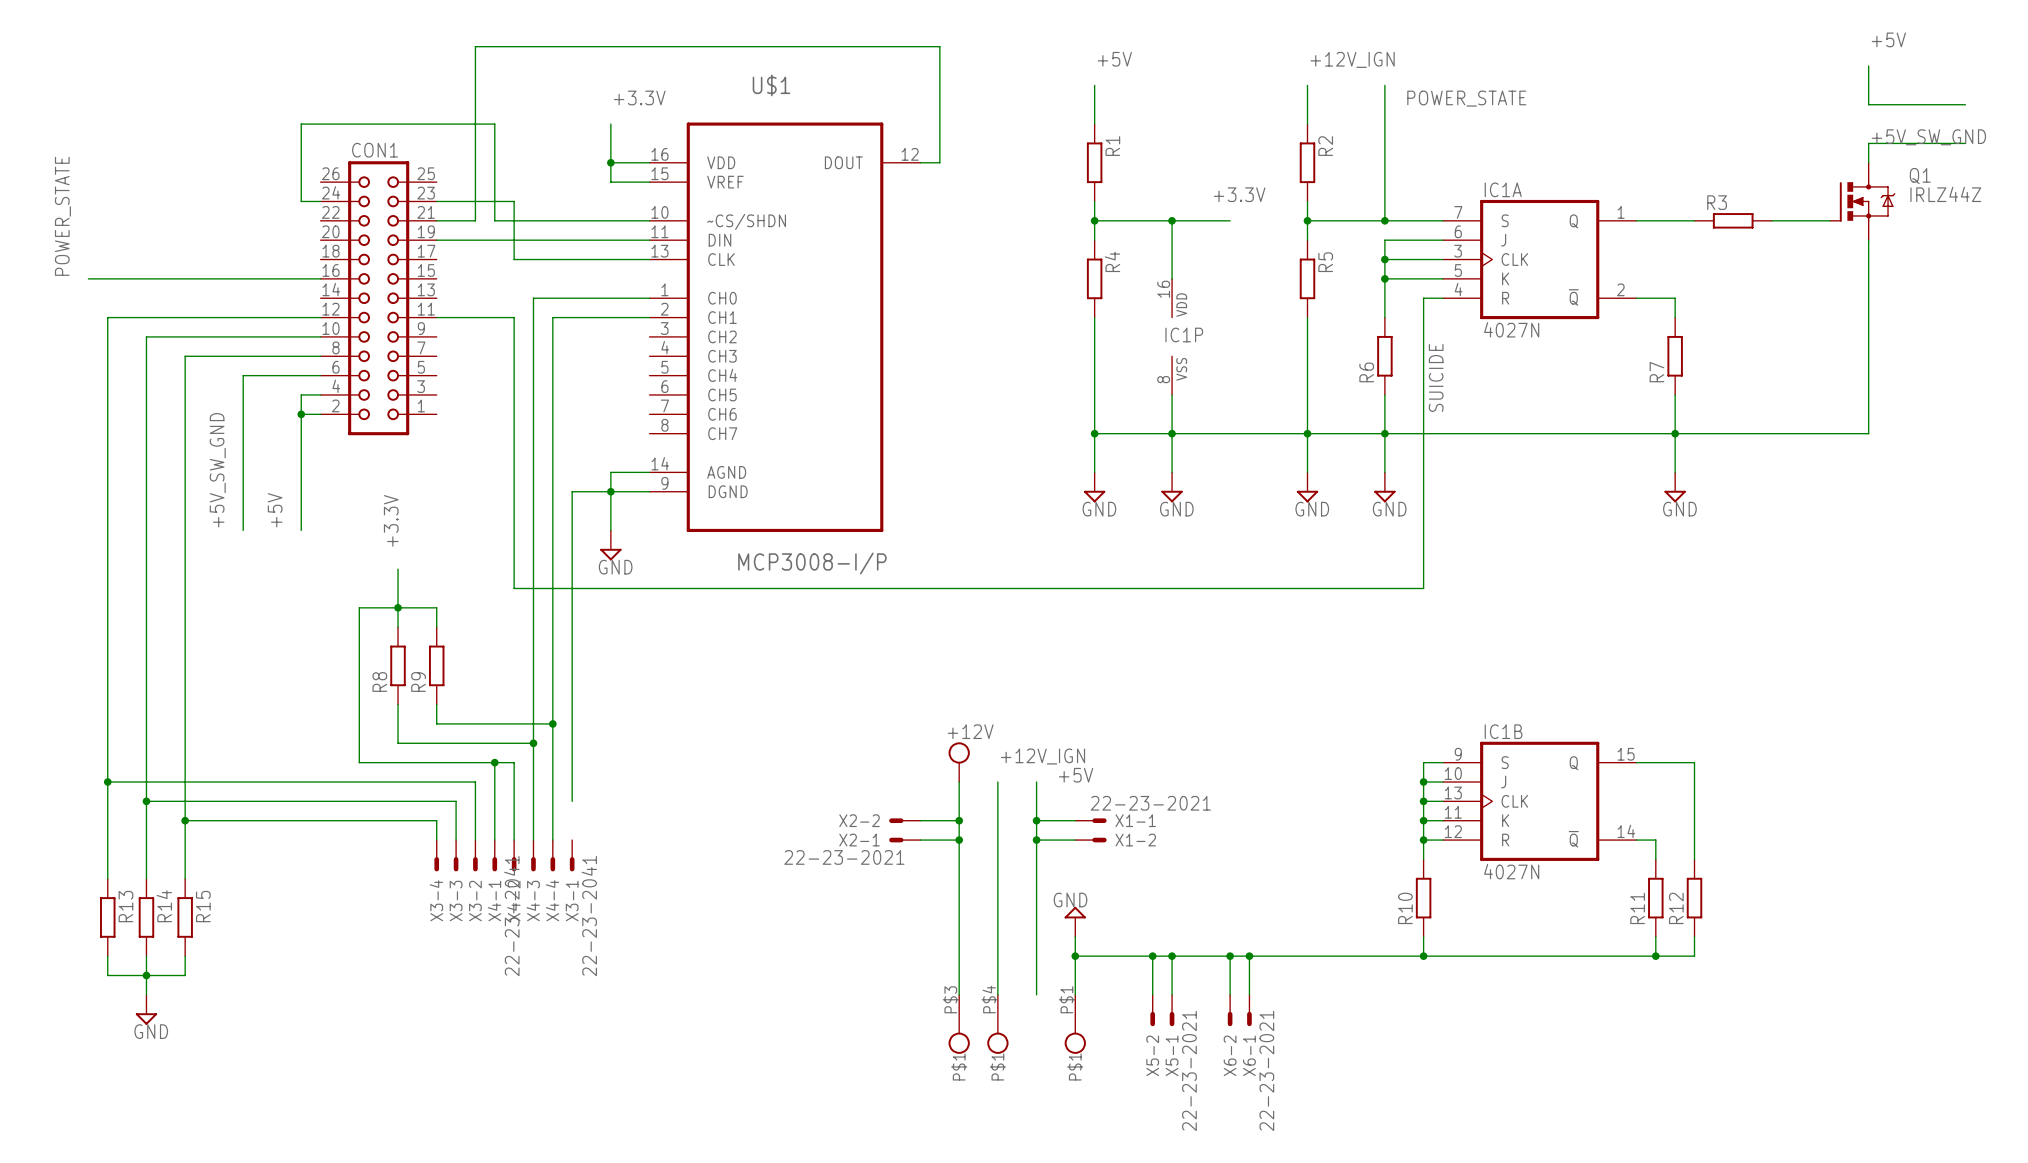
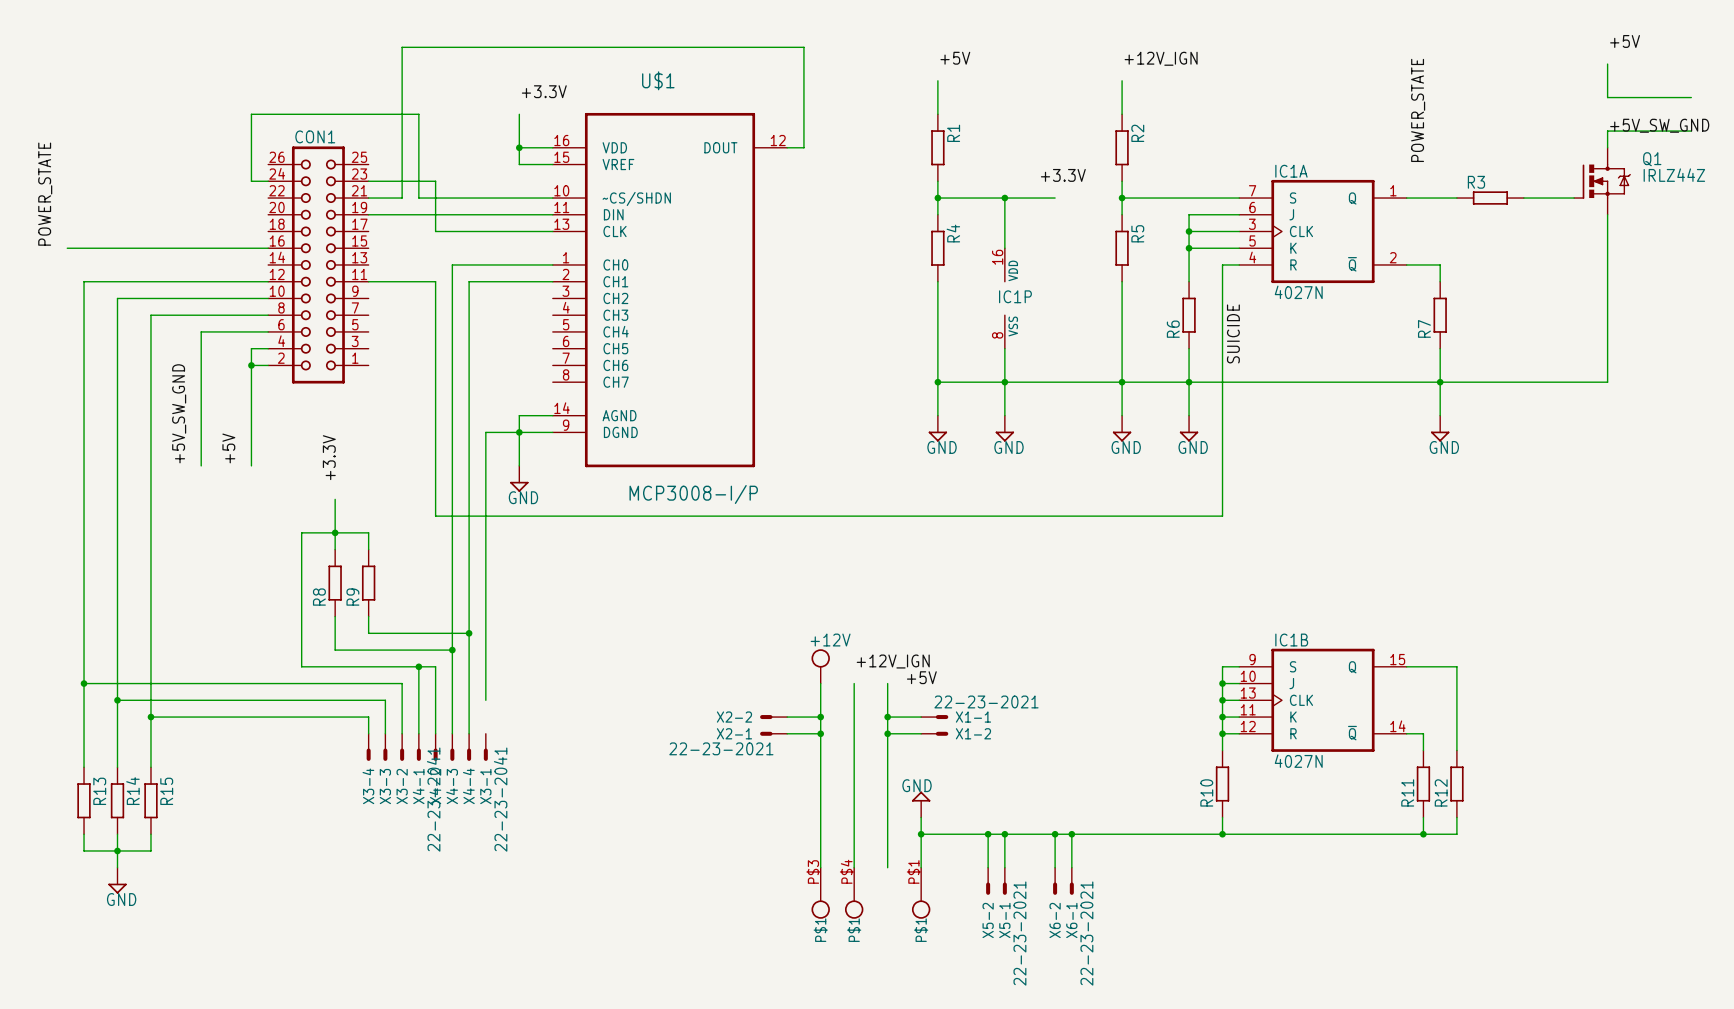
wire: (1384, 85) (1384, 220) -> none
label: POWER_STATE (1466, 98) -> none
label: none -> POWER_STATE (1418, 110)
junction: (1384, 220) -> none

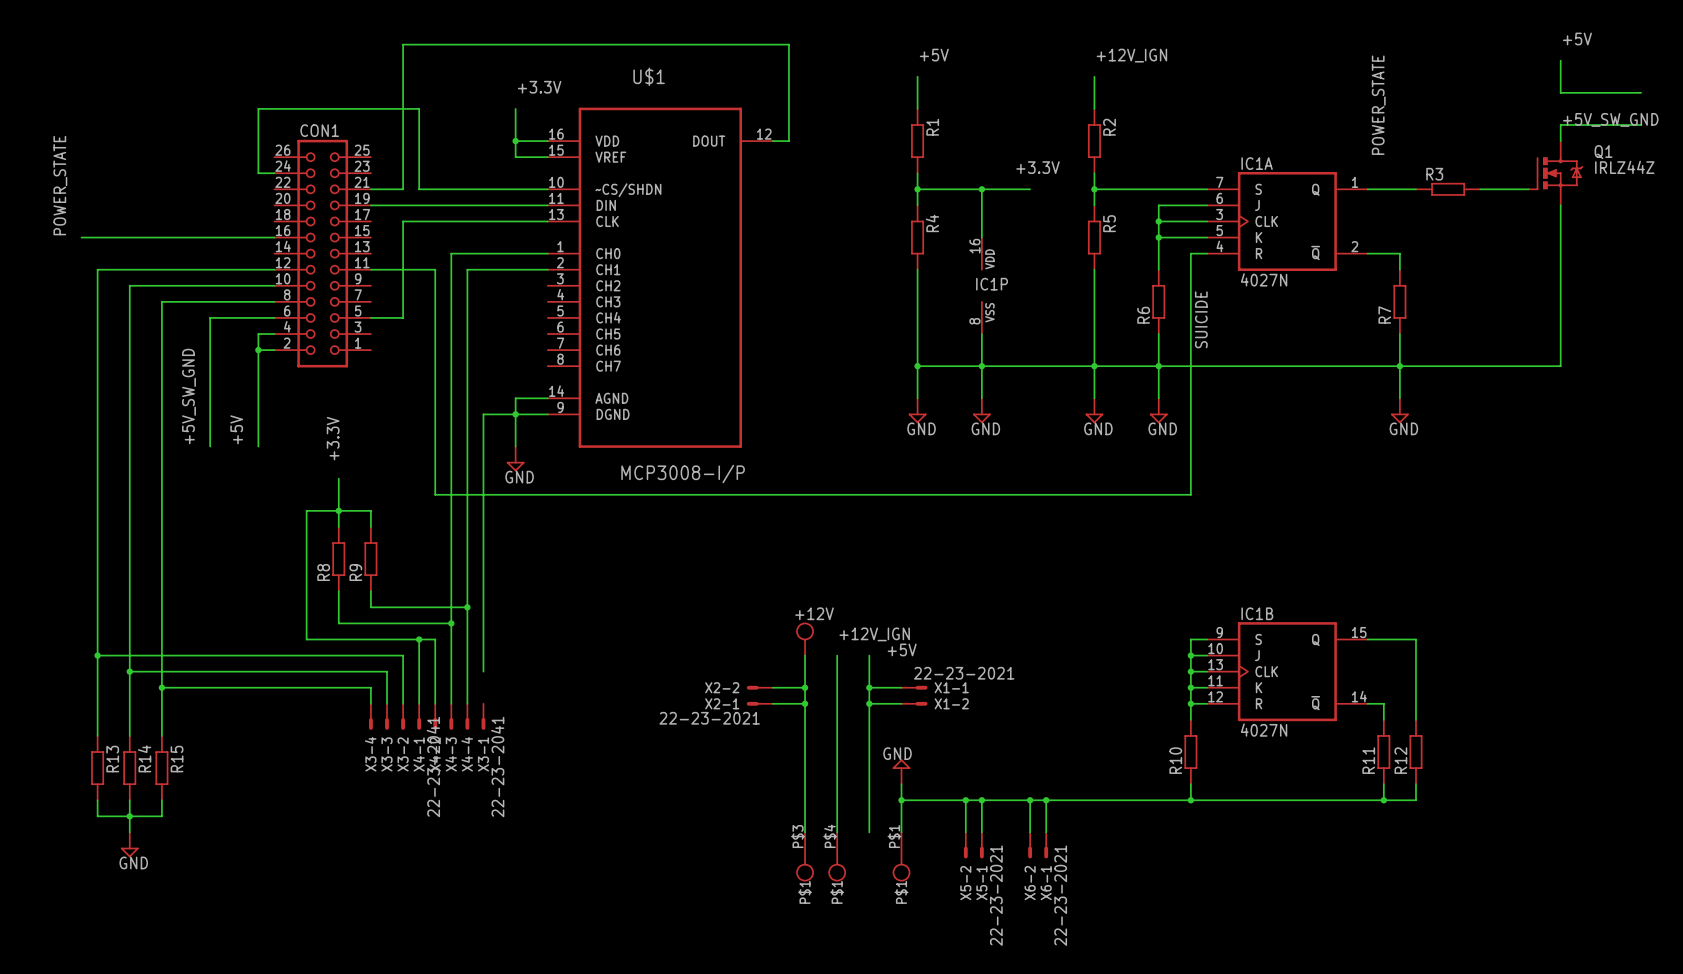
wire: (368, 181) (435, 181) (435, 231) -> (370, 317) (403, 317) (403, 221) (435, 221)

